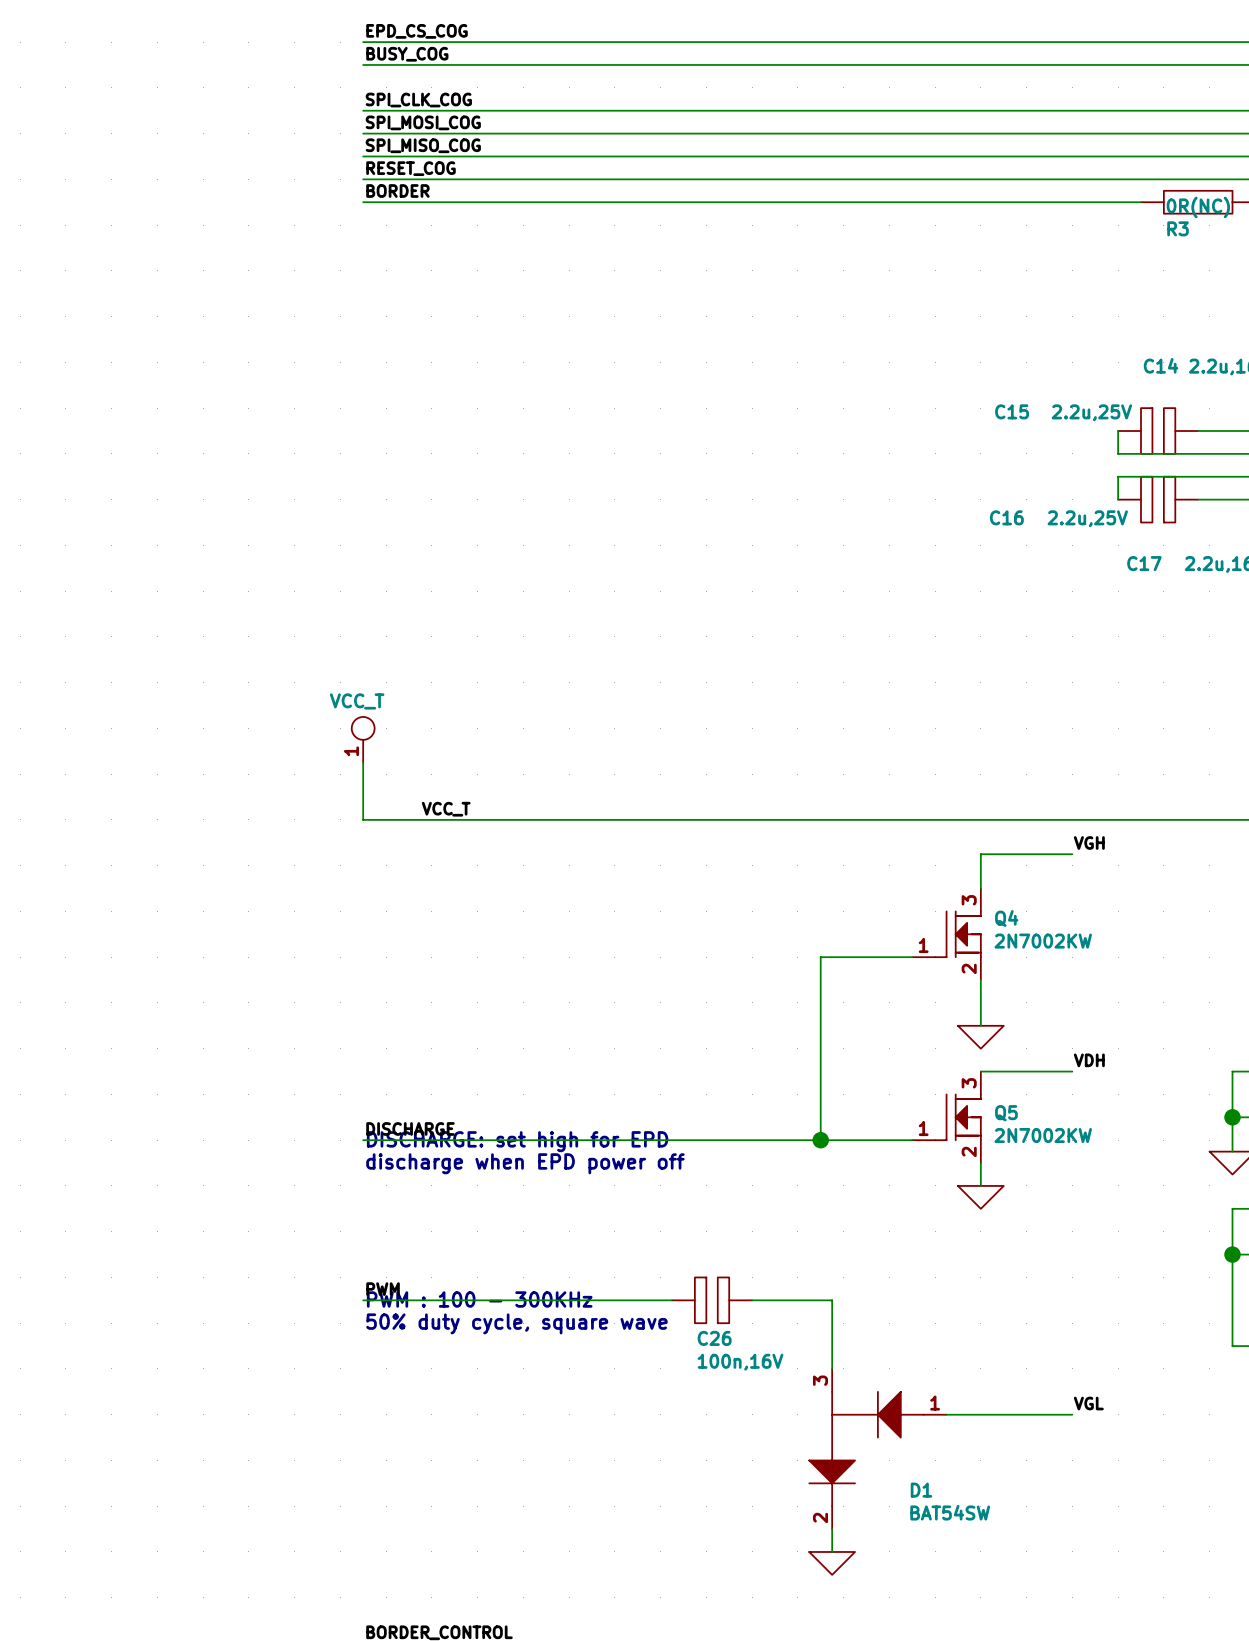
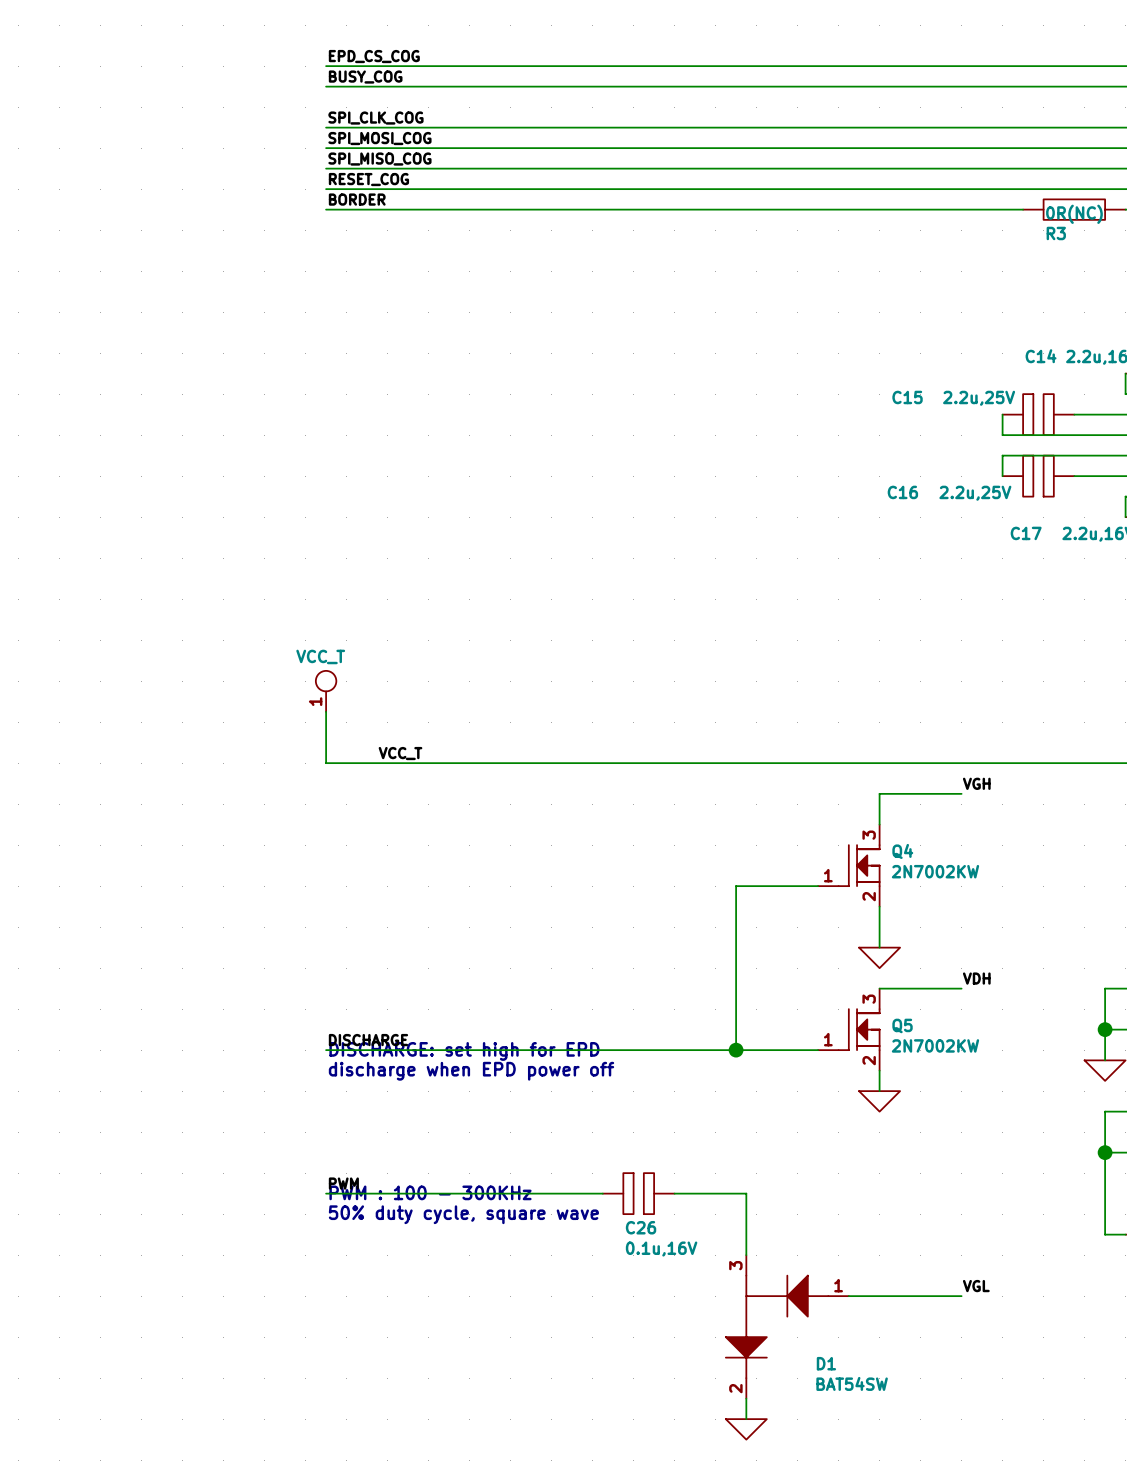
C26 value: 100n,16V (740, 1362) -> 0.1u,16V (661, 1249)

